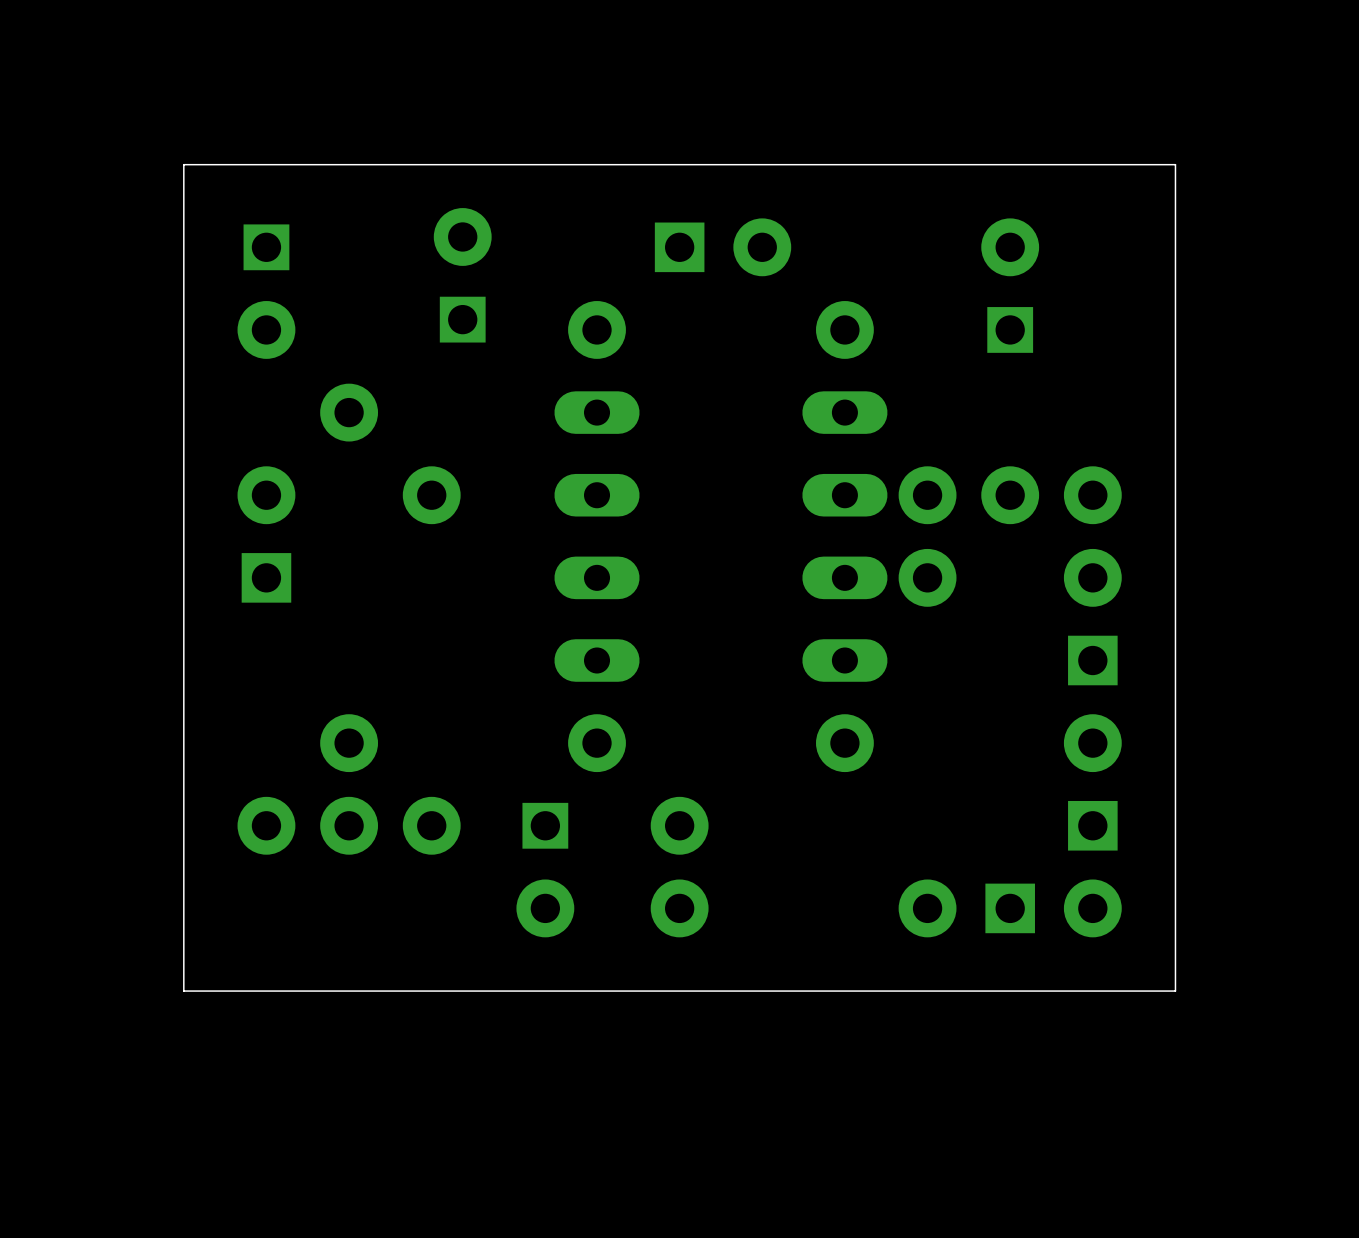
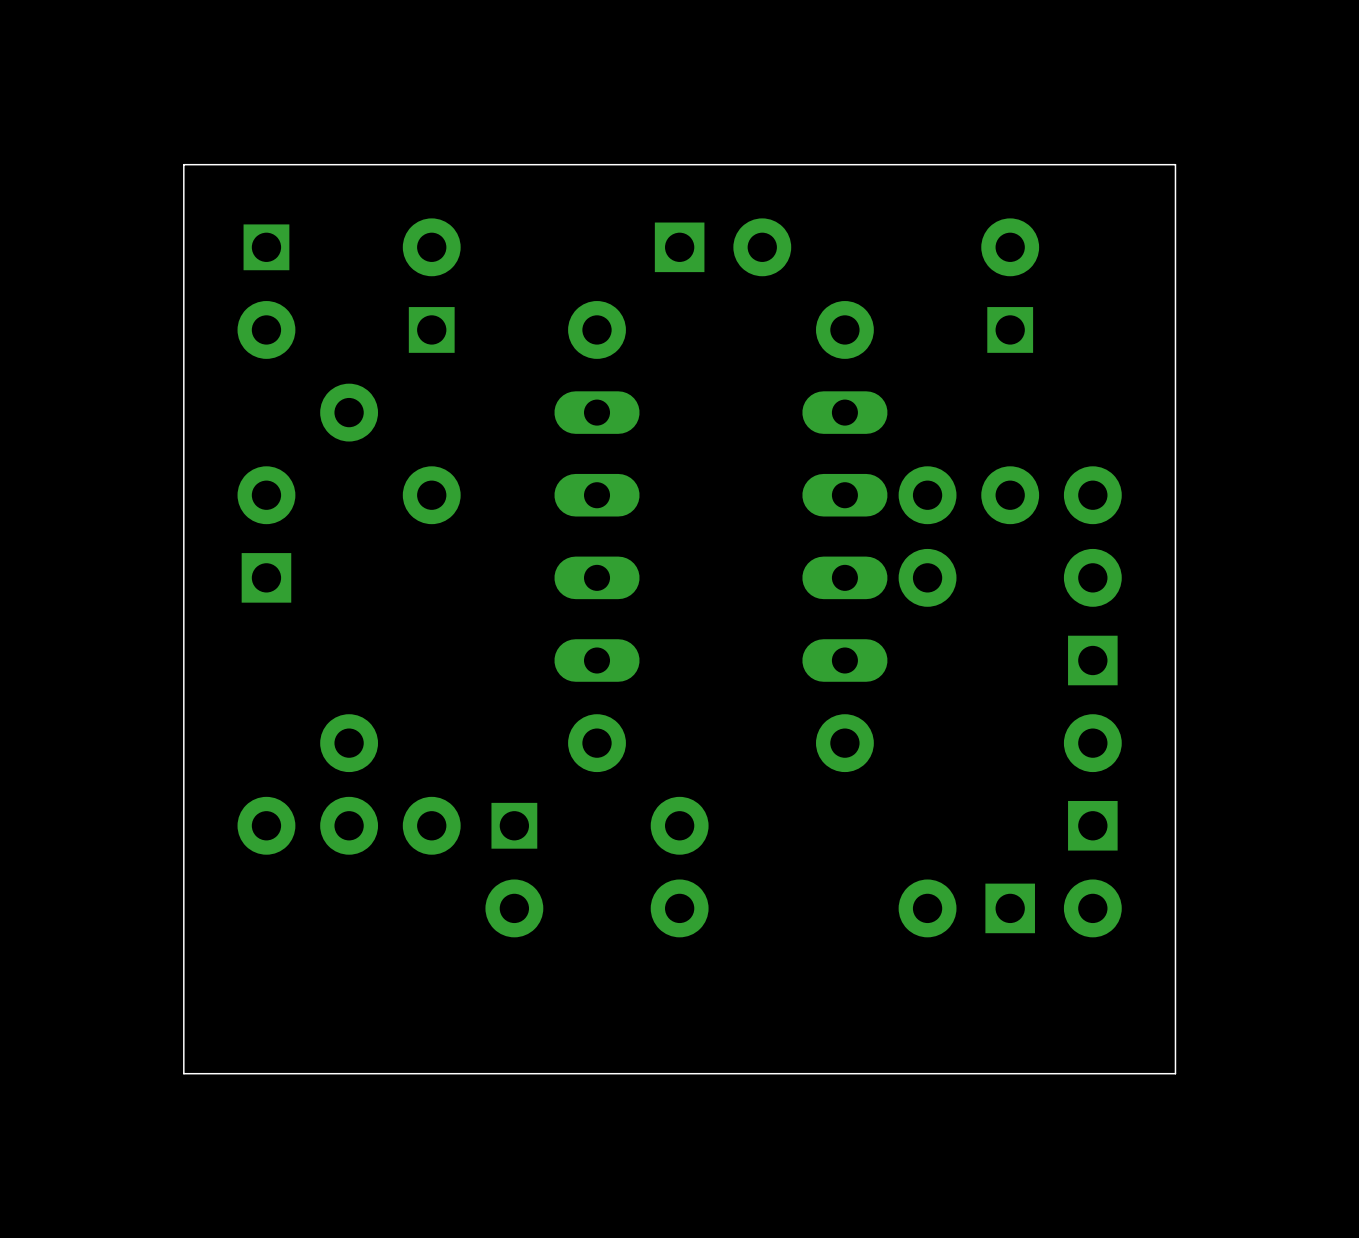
part position: (462, 275) -> (431, 285)
part position: (545, 870) -> (514, 870)
board edge: (1175, 991) (183, 991) -> (1175, 991) (1175, 1073) (183, 1073) (183, 991)

